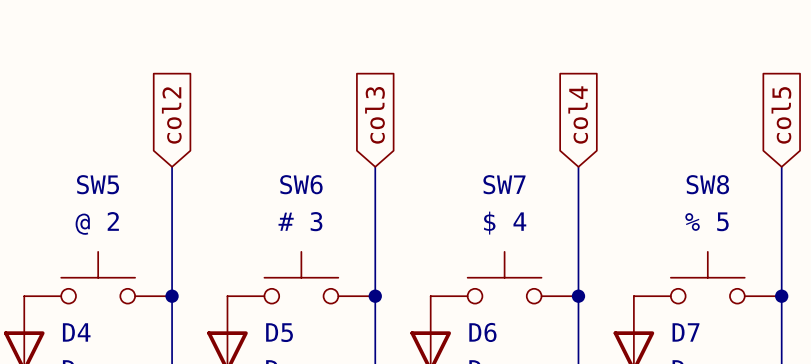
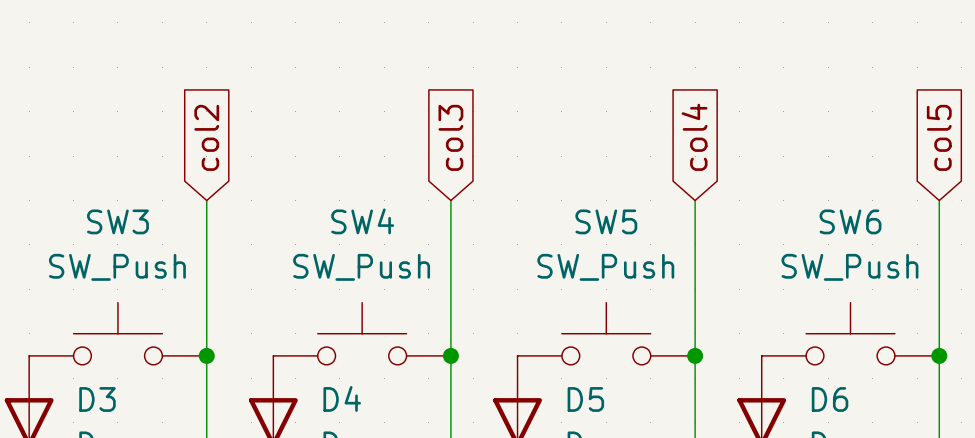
SW5 name: SW5 (98, 184) -> SW3 (117, 221)
SW6 name: SW6 (301, 184) -> SW4 (362, 221)
SW7 name: SW7 (504, 184) -> SW5 (606, 221)
SW8 name: SW8 (707, 184) -> SW6 (850, 221)
SW6 value: # 3 (300, 221) -> SW_Push (361, 267)
SW8 value: % 5 (706, 221) -> SW_Push (849, 267)
SW5 value: @ 2 (97, 223) -> SW_Push (117, 267)
SW7 value: $ 4 (505, 223) -> SW_Push (605, 267)
D4 name: D4 (76, 332) -> D3 (97, 399)
D5 name: D5 (279, 332) -> D4 (342, 398)
D6 name: D6 (482, 332) -> D5 (585, 399)
D7 name: D7 (686, 332) -> D6 (830, 399)

